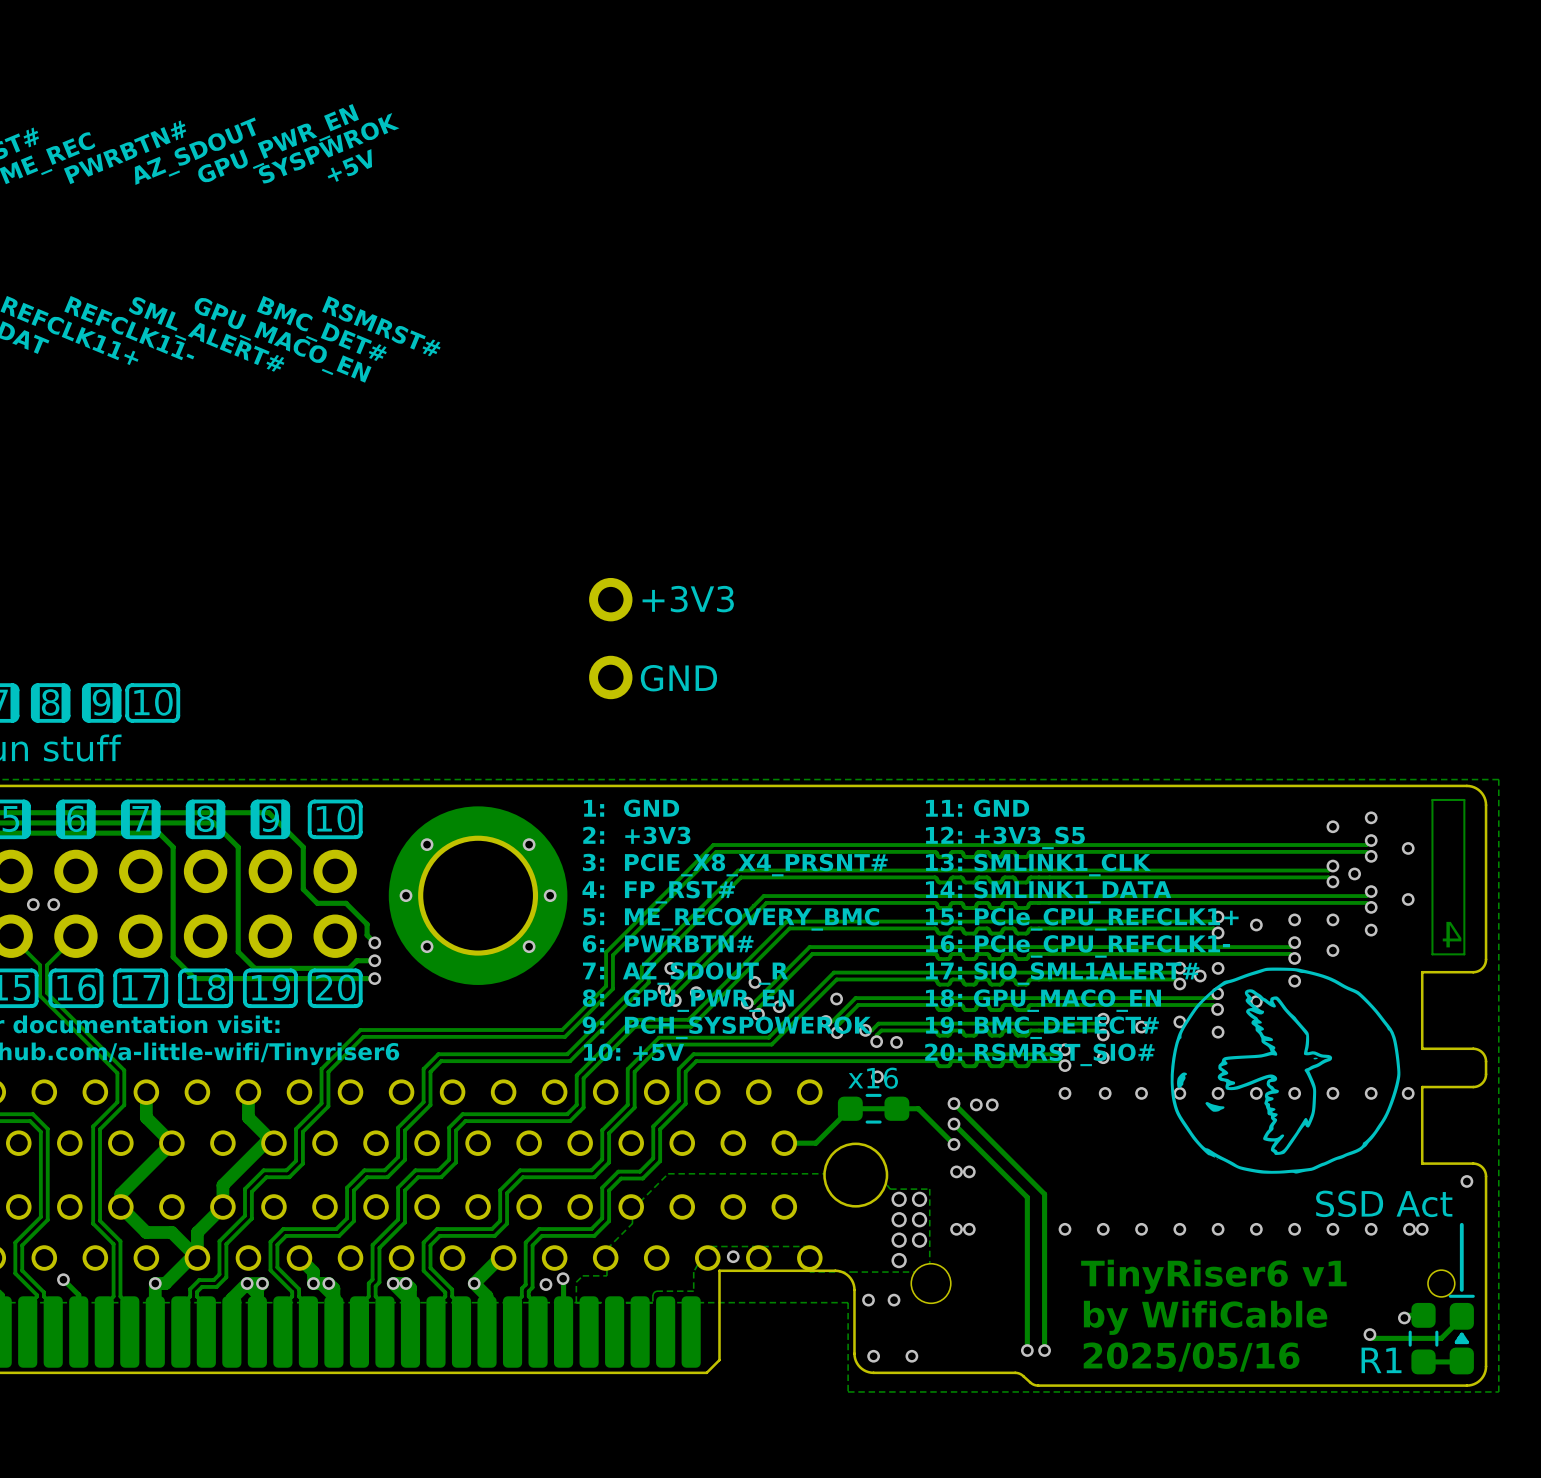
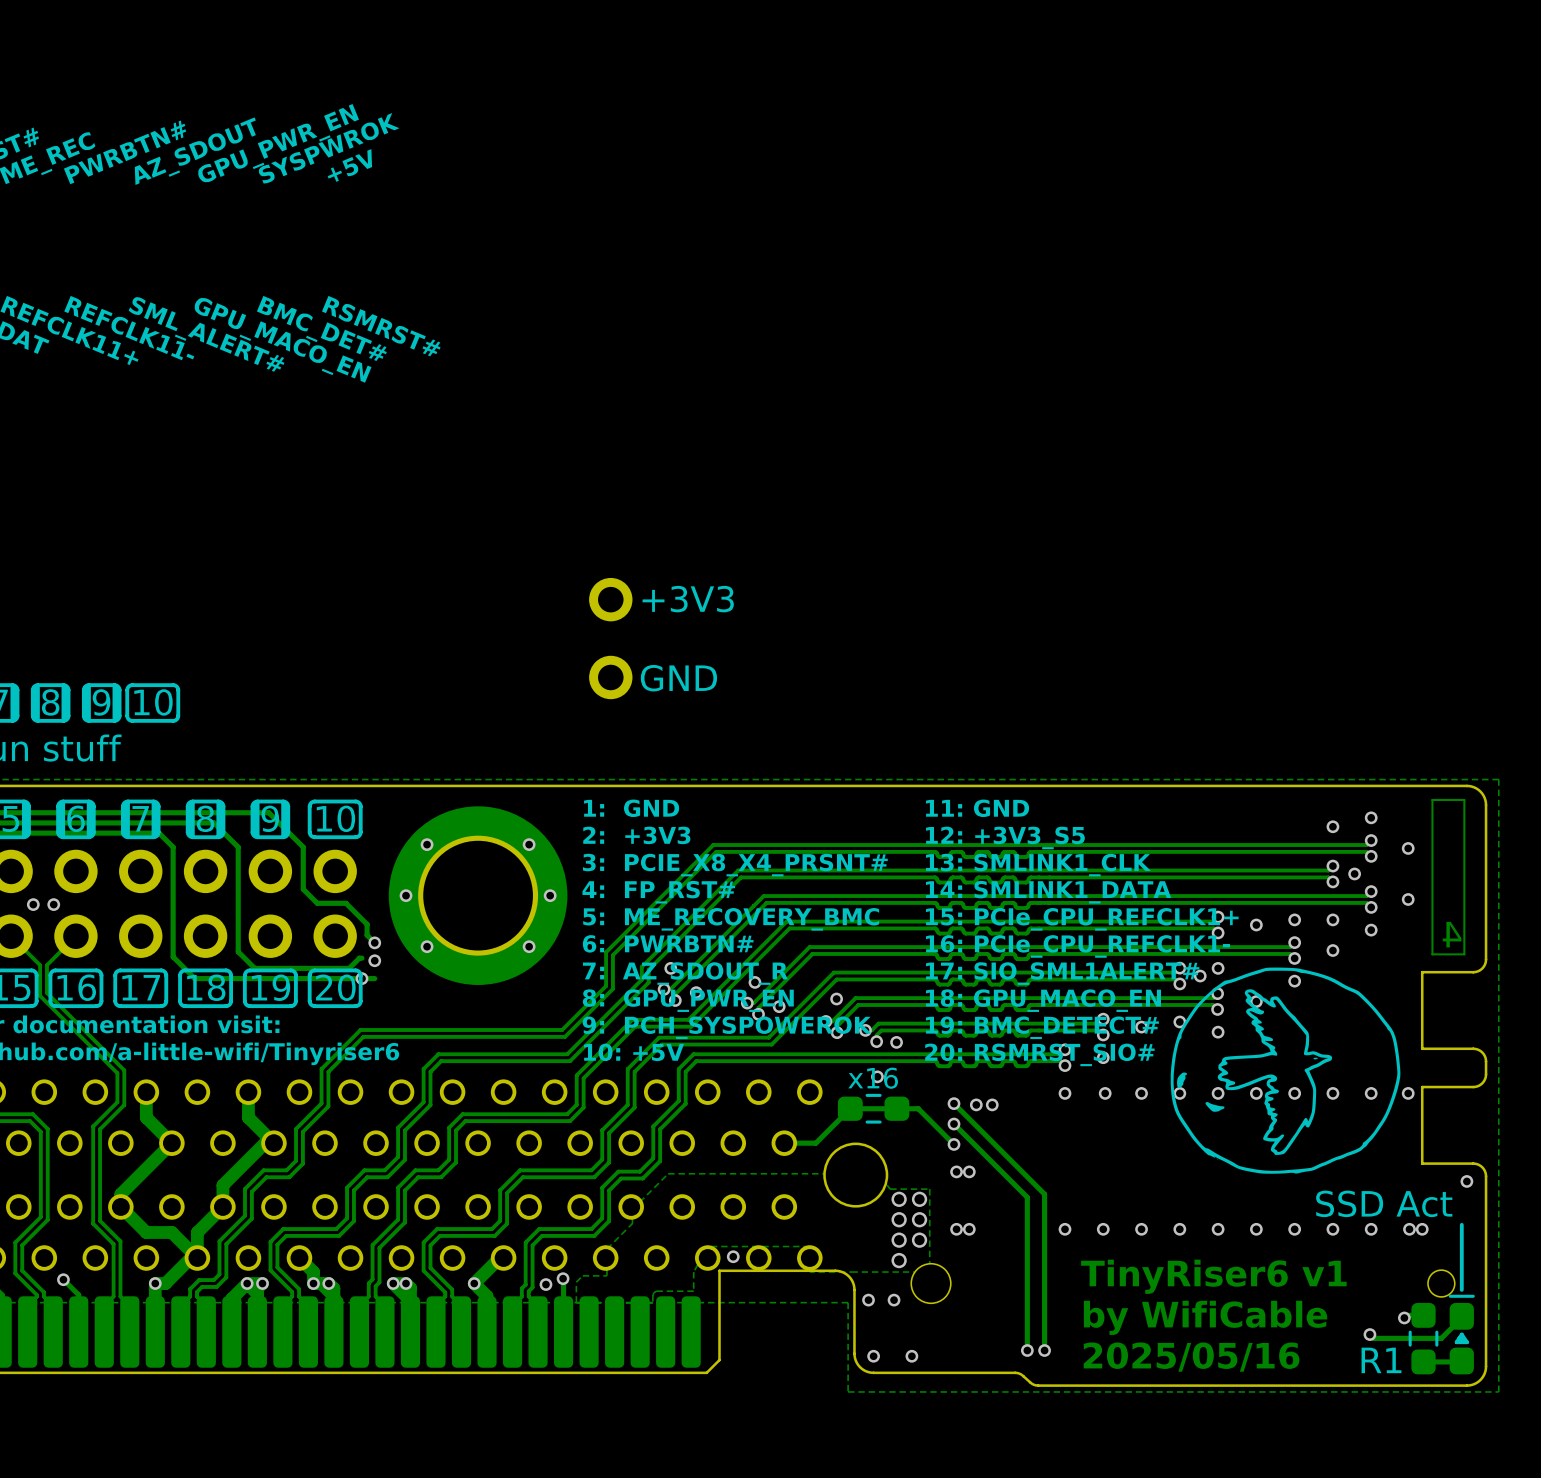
track: (374, 960) (356, 960) -> (361, 958) (356, 960)
via position: (374, 978) -> (361, 978)

